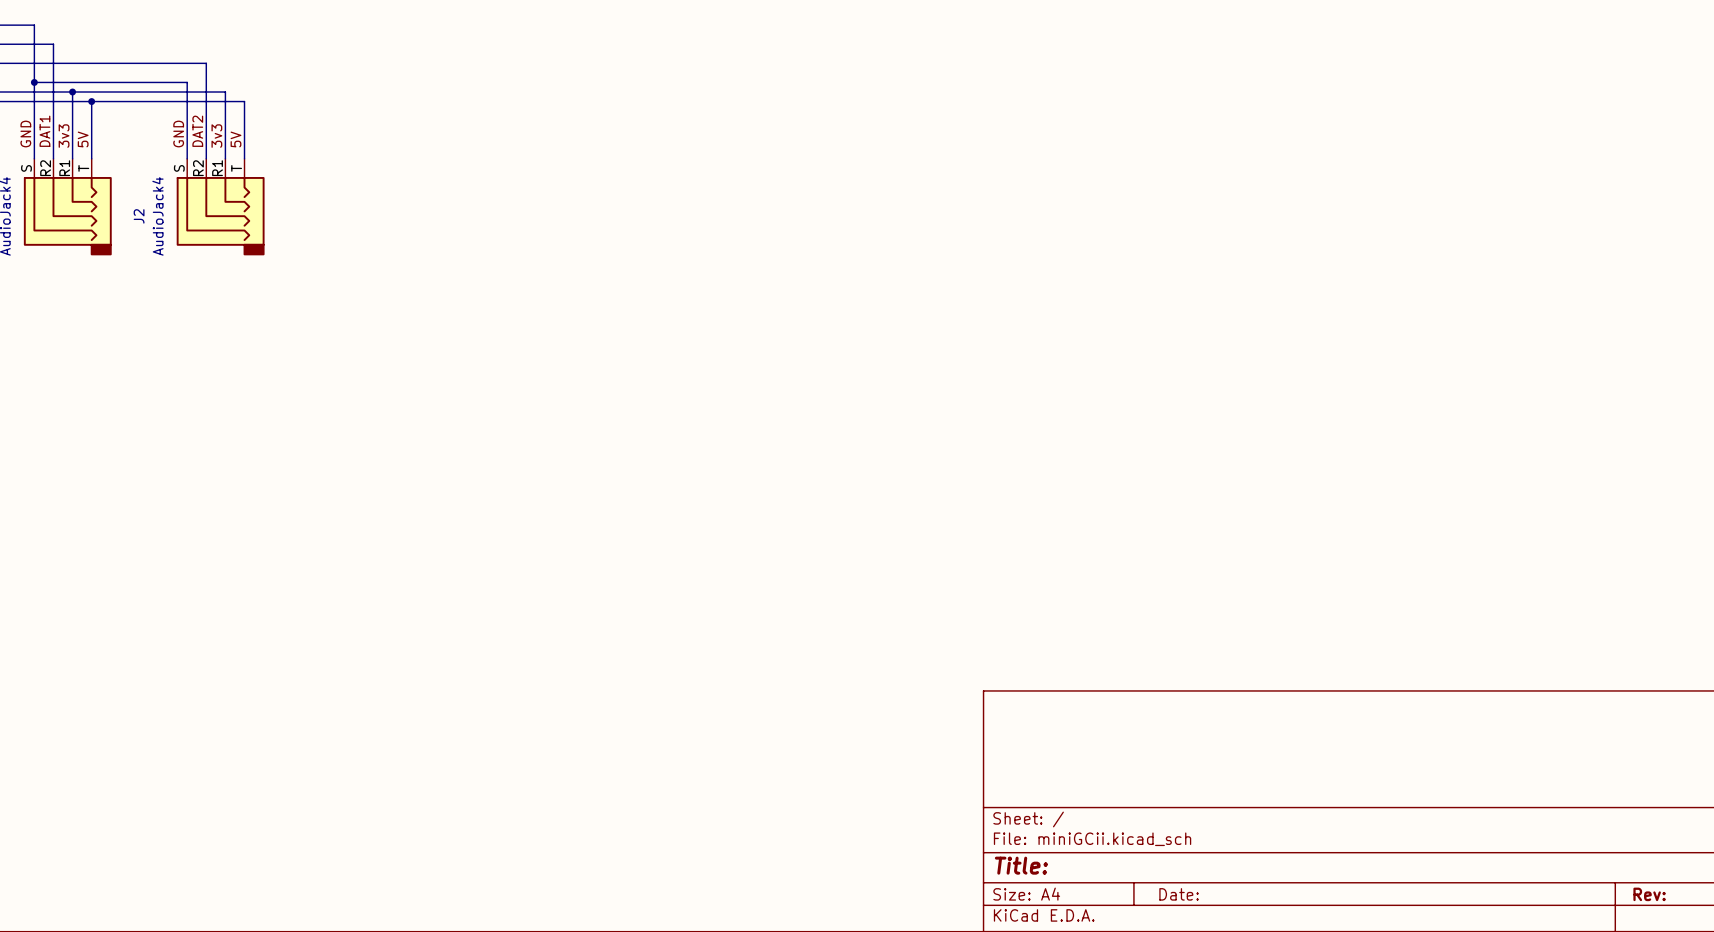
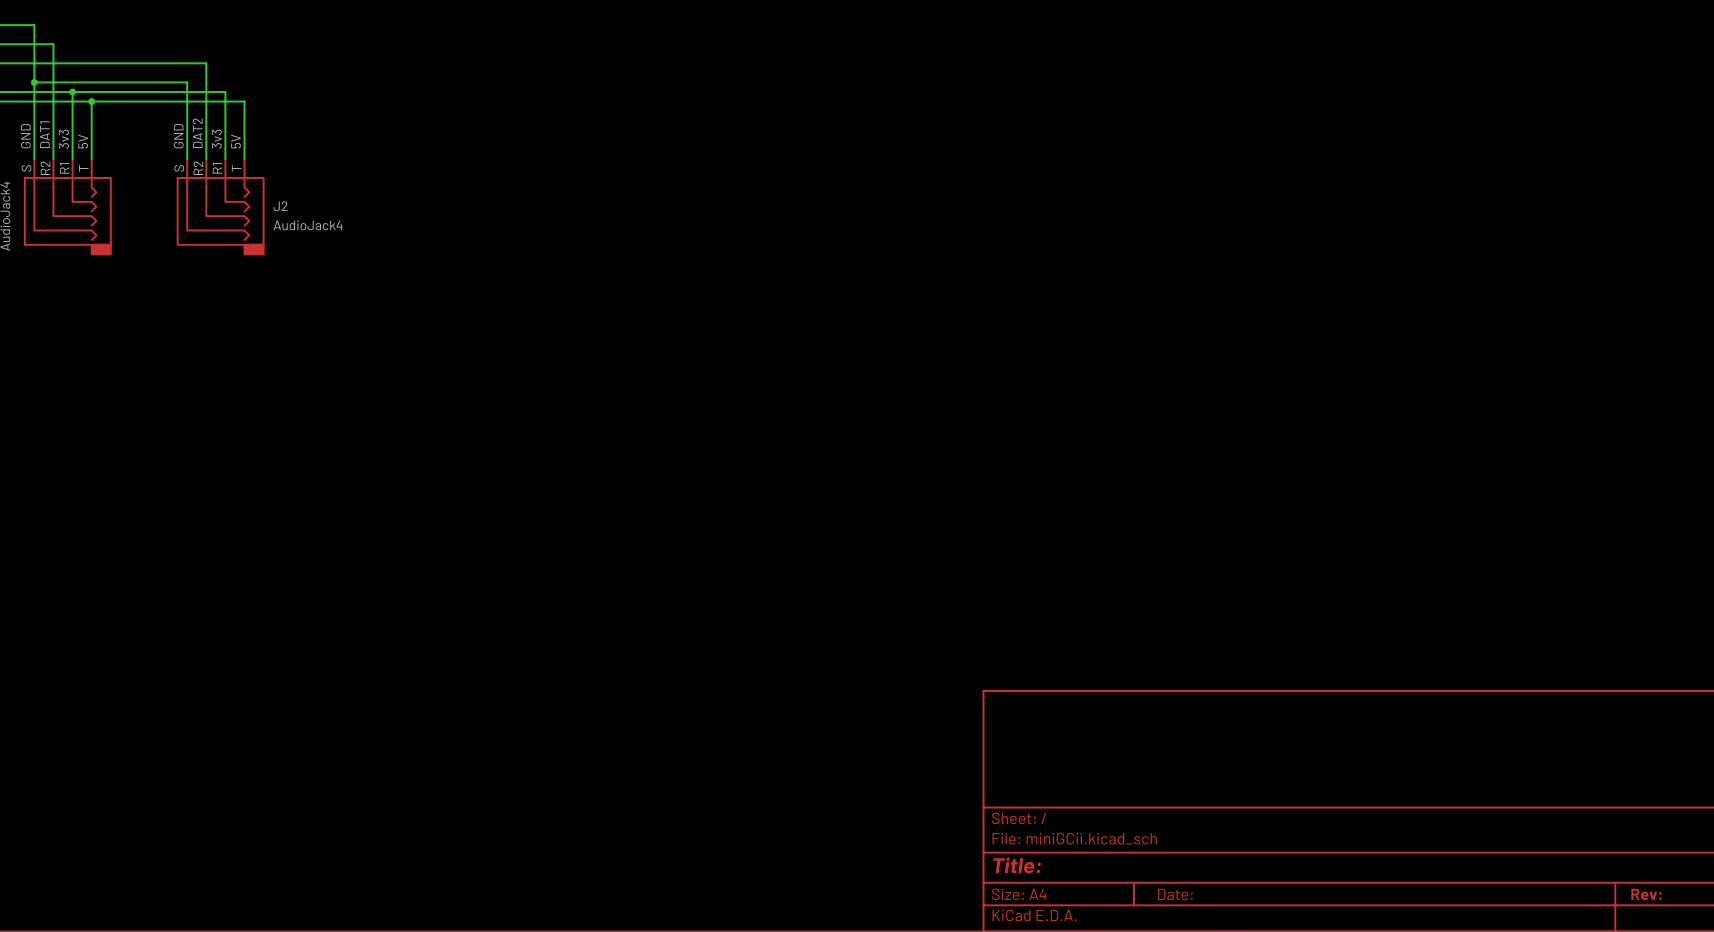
J2 name rotation: 0° (139, 216) -> 90° clockwise (280, 206)
J2 name position: J2 (139, 216) -> J2 (280, 206)
J2 value rotation: 0° (157, 216) -> 90° clockwise (308, 225)
J2 value position: AudioJack4 (157, 216) -> AudioJack4 (308, 225)

